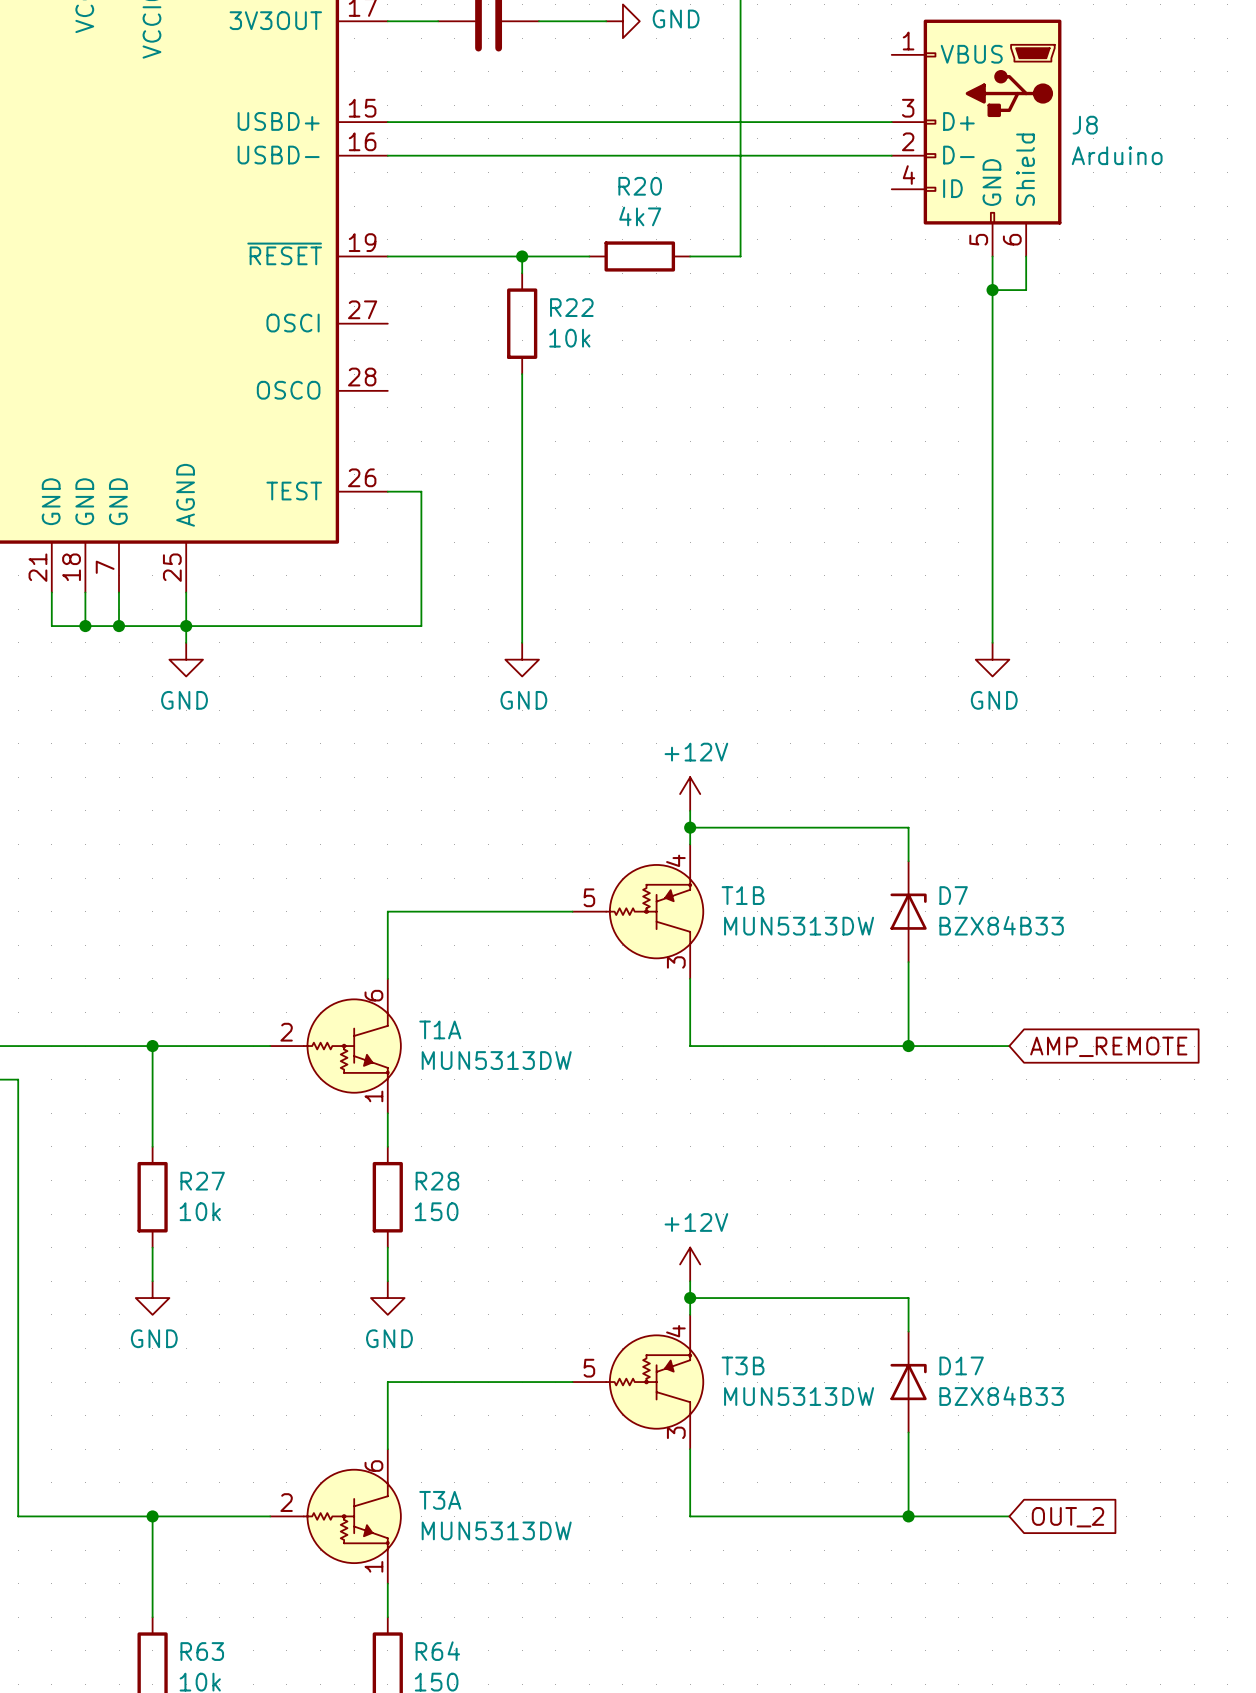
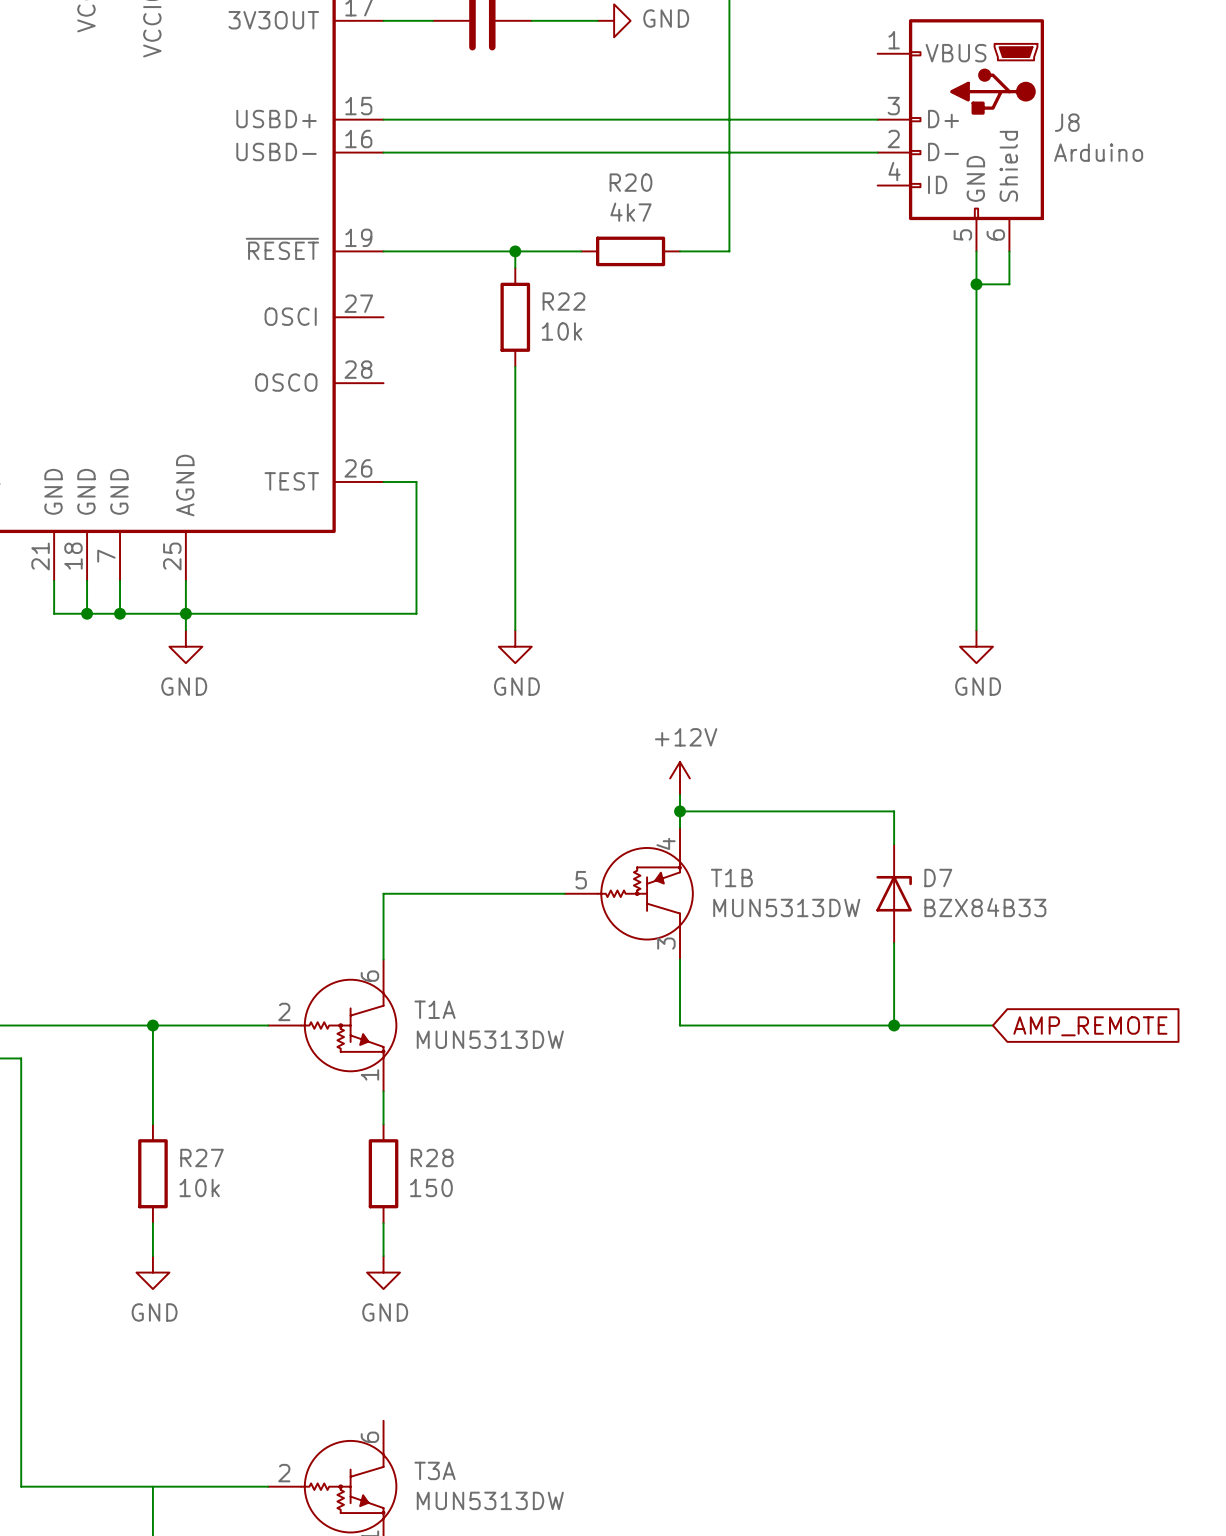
power symbol: +12V (690, 1264) -> none
wire: (690, 1281) (690, 1314) -> none
wire: (690, 1298) (908, 1298) (908, 1331) -> none
junction: (690, 1298) -> none
wire: (572, 1382) (387, 1382) (387, 1449) -> none
T3B: MUN5313DW (637, 1382) -> none
D17: BZX84B33 (908, 1382) -> none
wire: (908, 1432) (908, 1516) -> none
wire: (690, 1449) (690, 1516) (1009, 1516) -> none
junction: (152, 1516) -> none
junction: (908, 1516) -> none
global label: OUT_2 (1067, 1517) -> none

